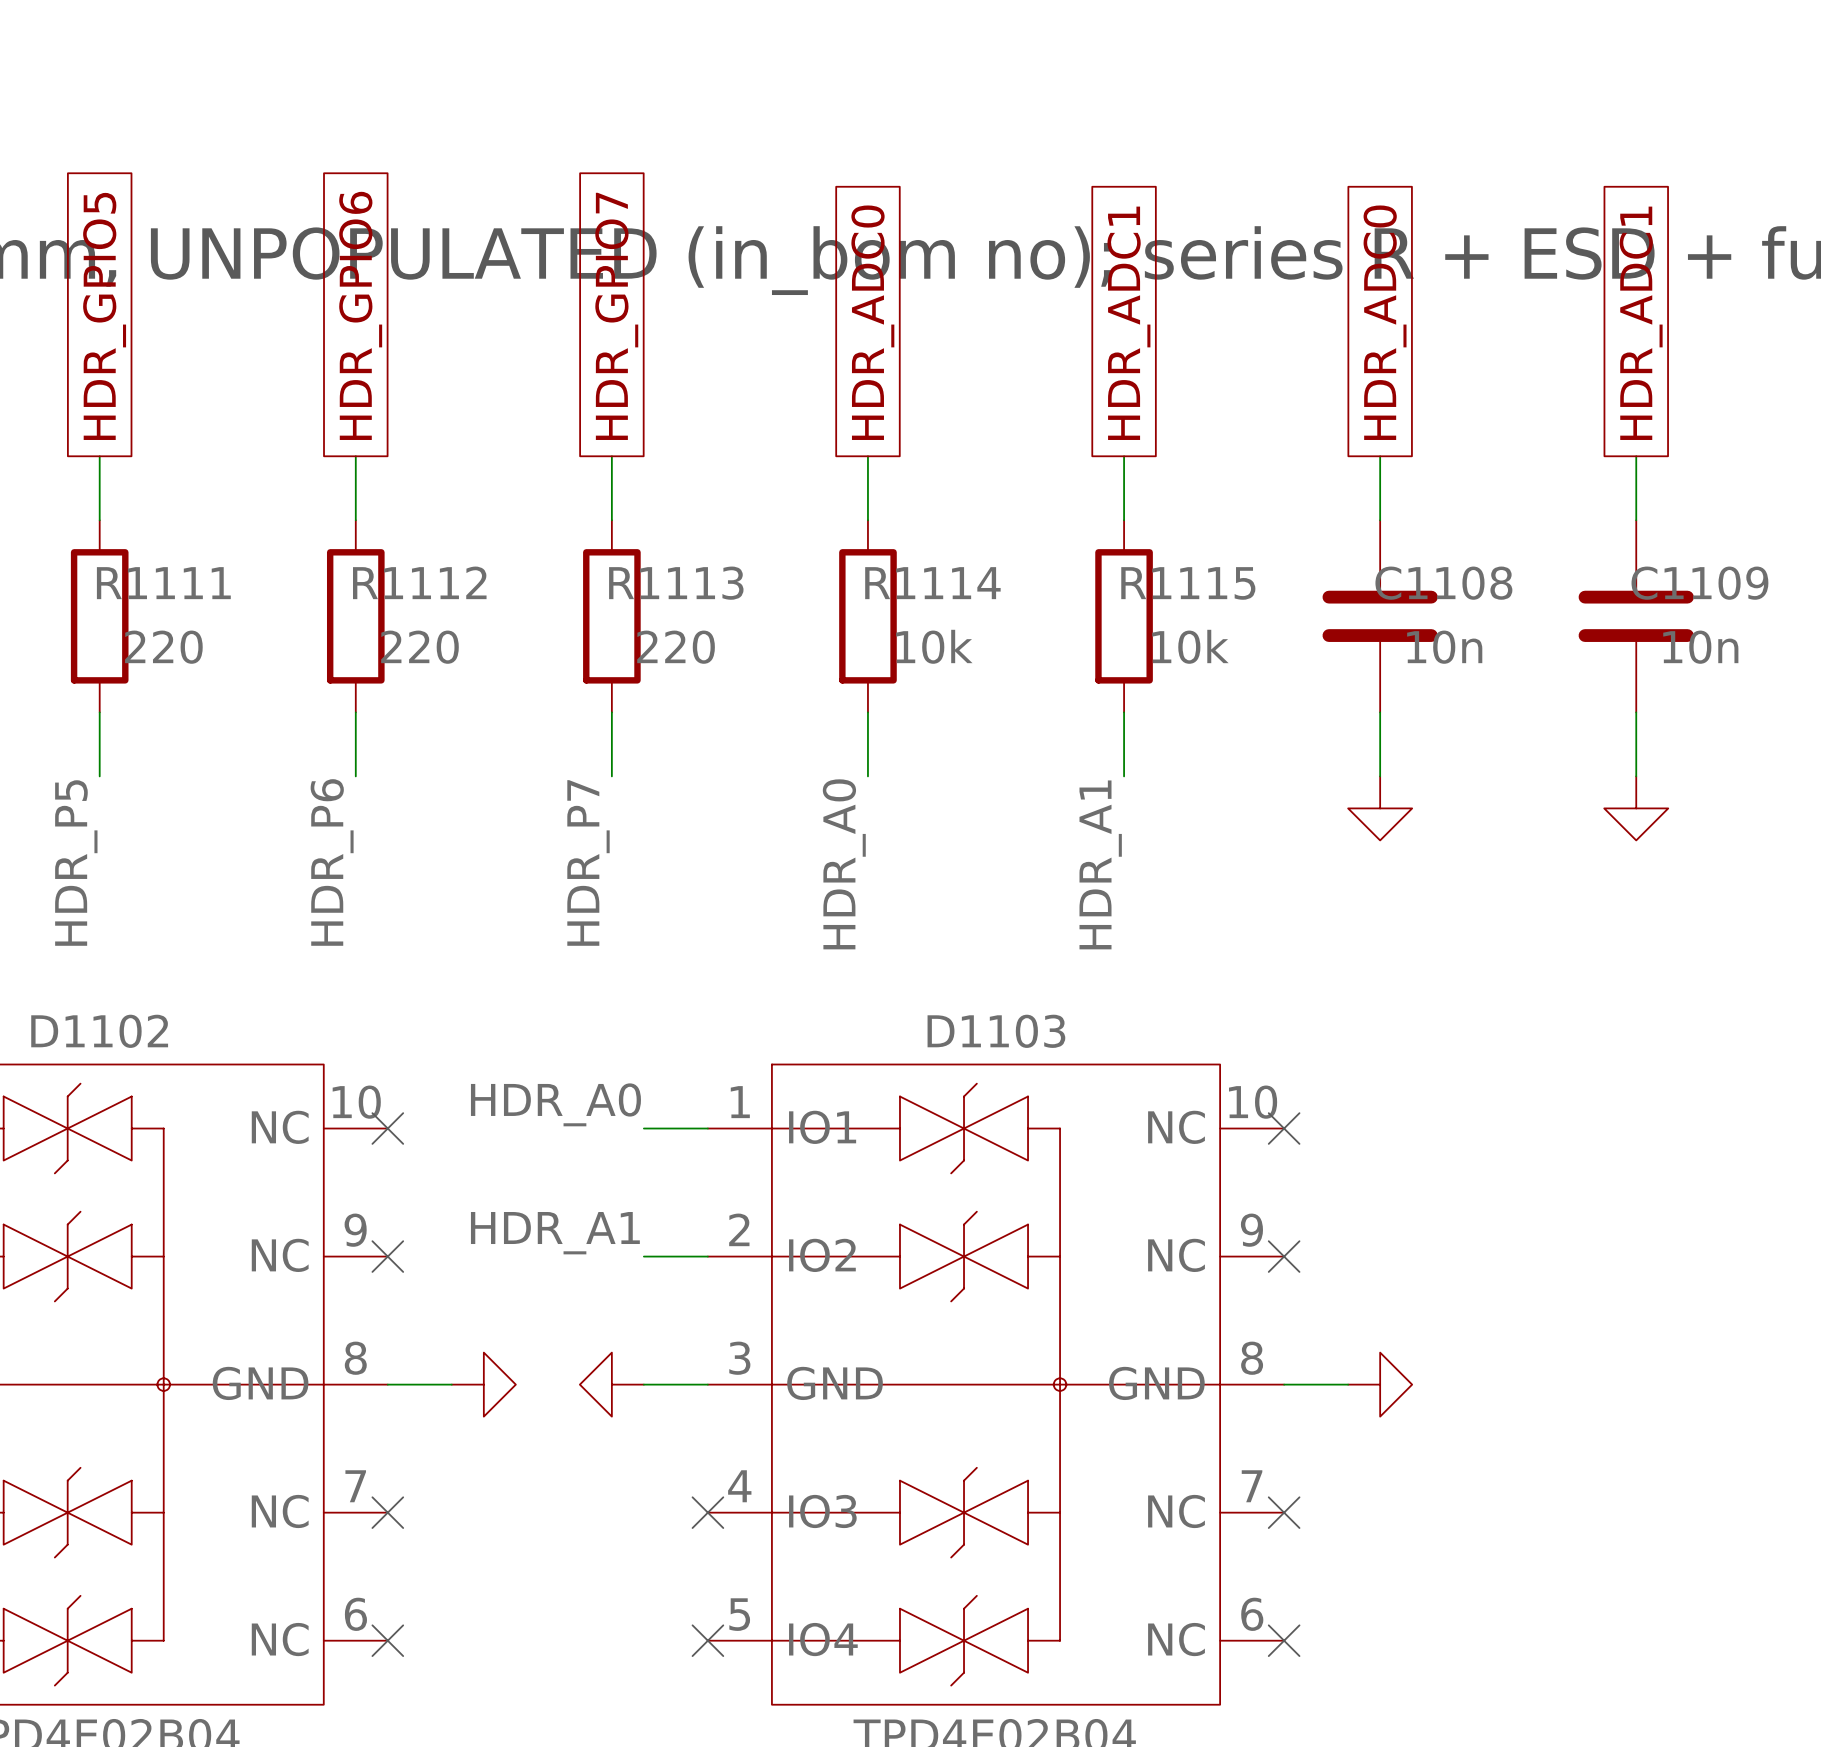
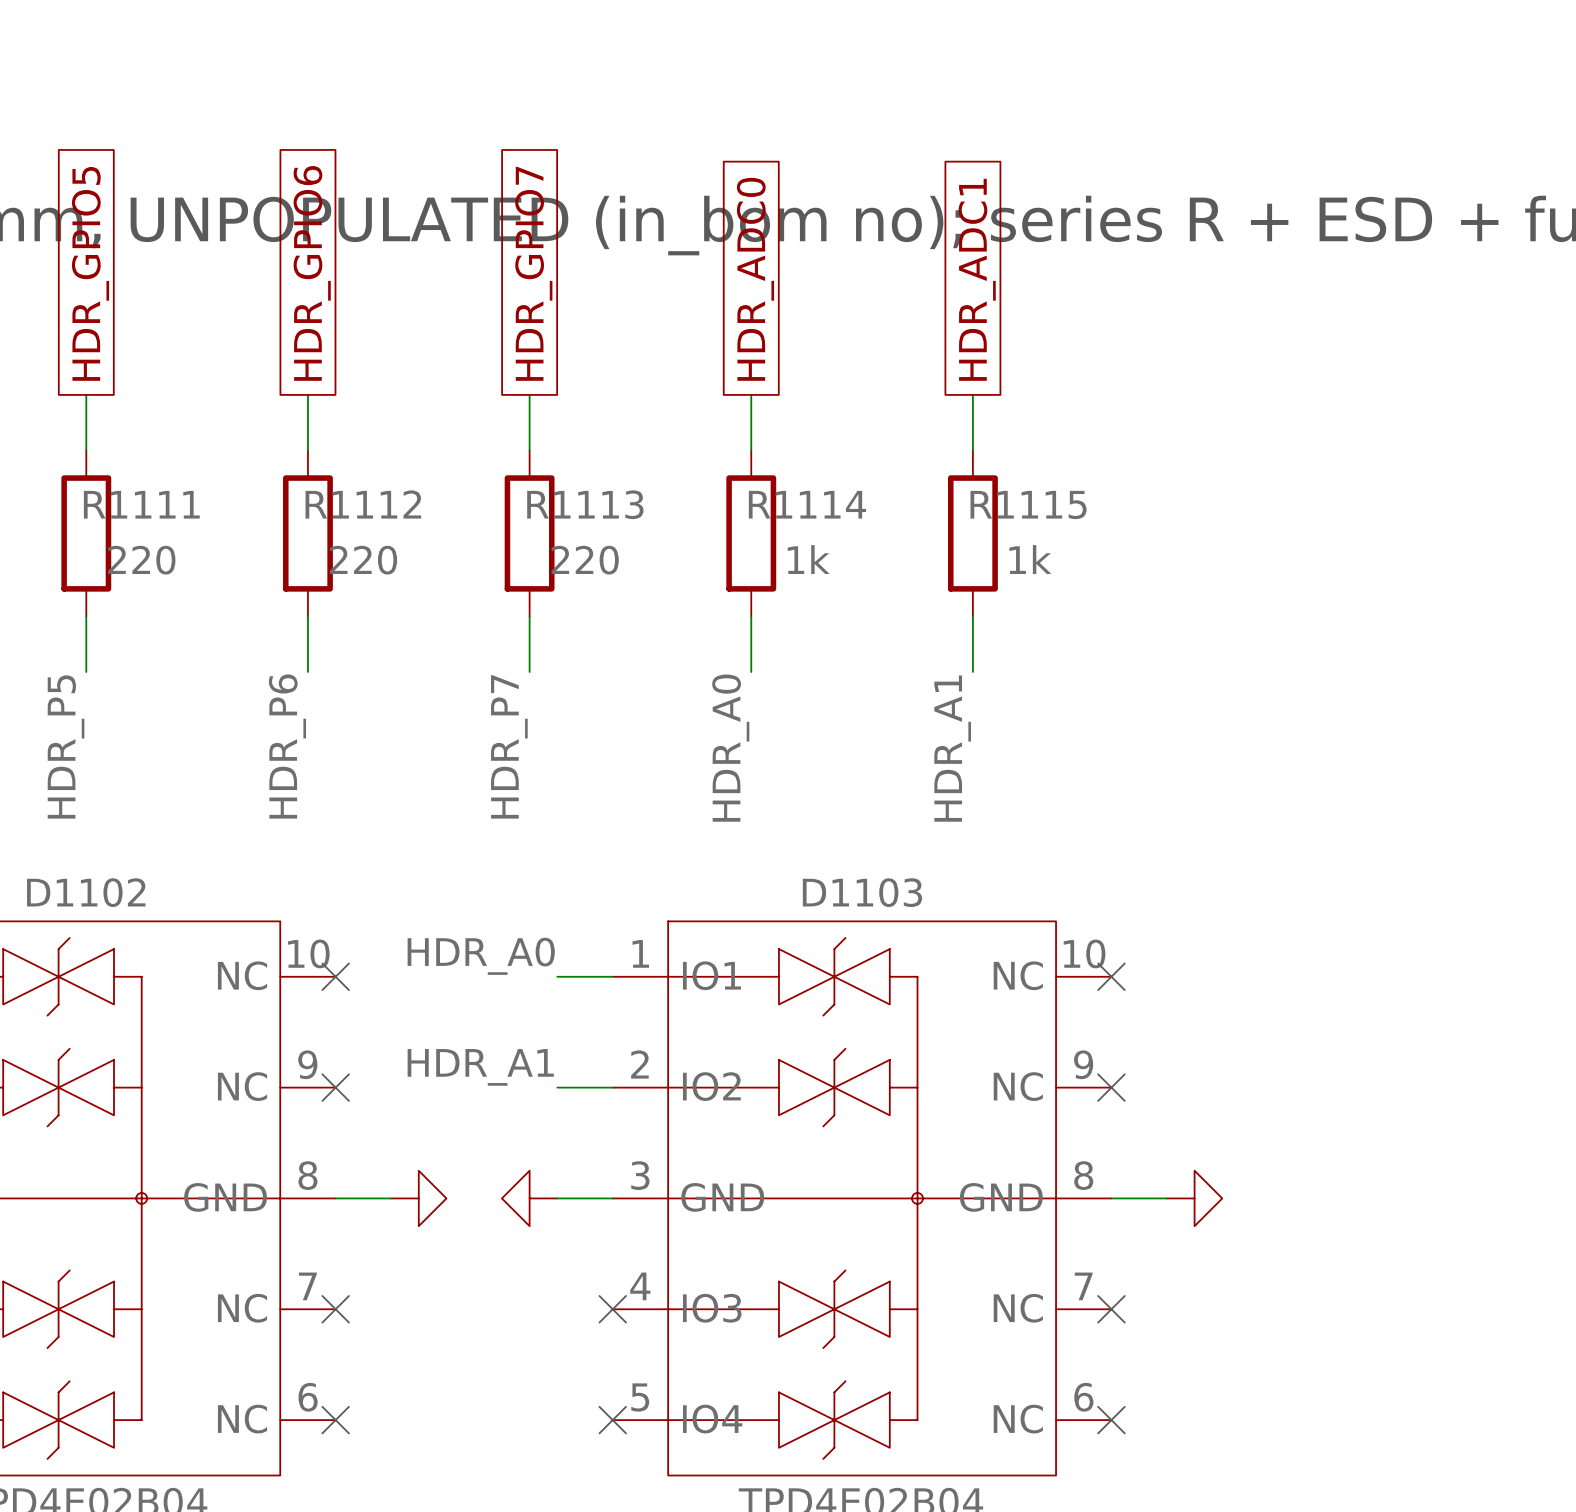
global label: HDR_ADC0 (1385, 322) -> none
global label: HDR_ADC1 (1641, 323) -> none
wire: (1380, 456) (1380, 520) -> none
wire: (1636, 456) (1636, 520) -> none
C1108: 10n (1380, 616) -> none
C1109: 10n (1636, 616) -> none
R1114 value: 10k (934, 646) -> 1k (808, 559)
R1115 value: 10k (1190, 646) -> 1k (1030, 559)
wire: (1380, 712) (1380, 776) -> none
wire: (1636, 712) (1636, 776) -> none
power symbol: (1380, 808) -> none
power symbol: (1636, 808) -> none

